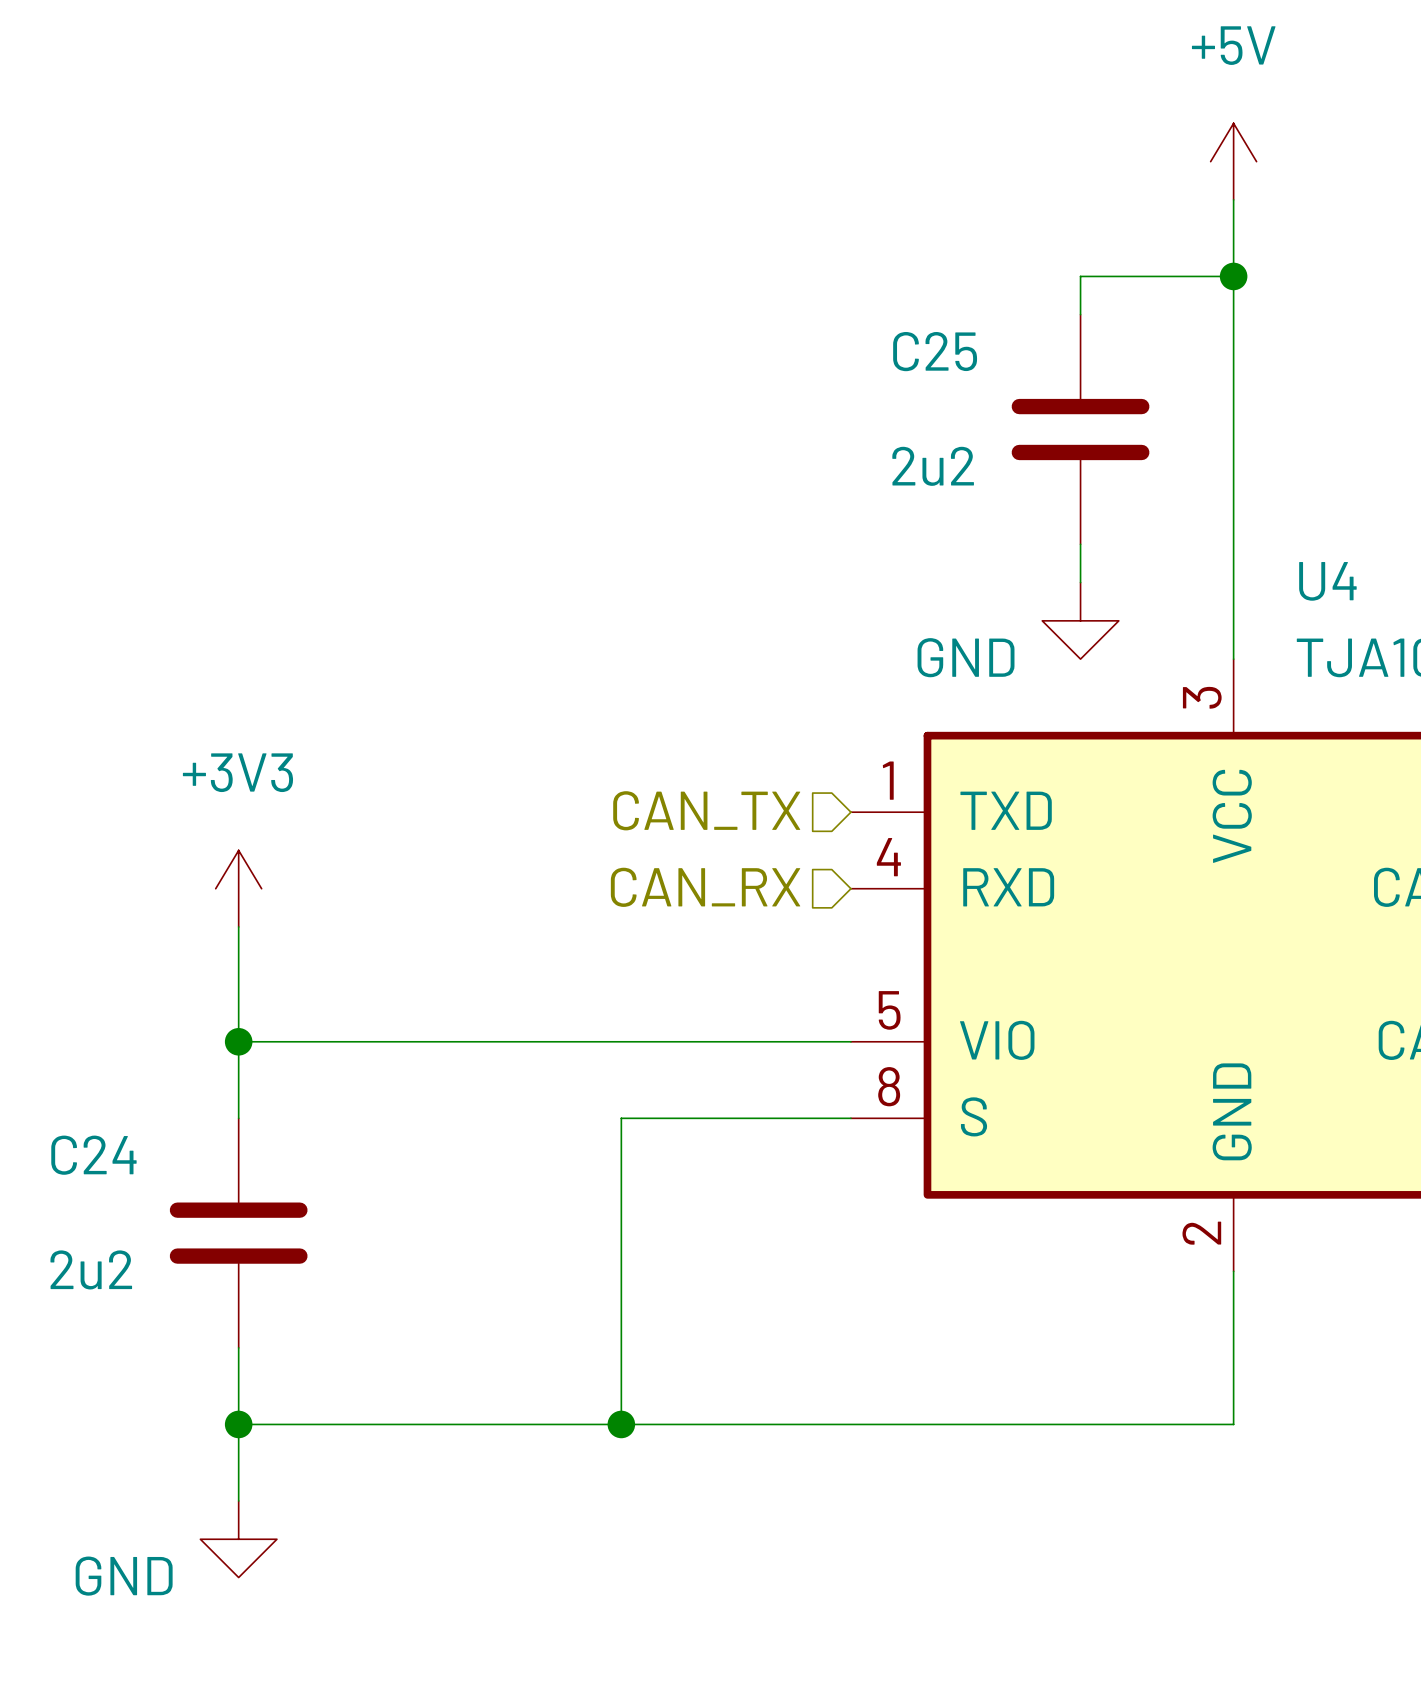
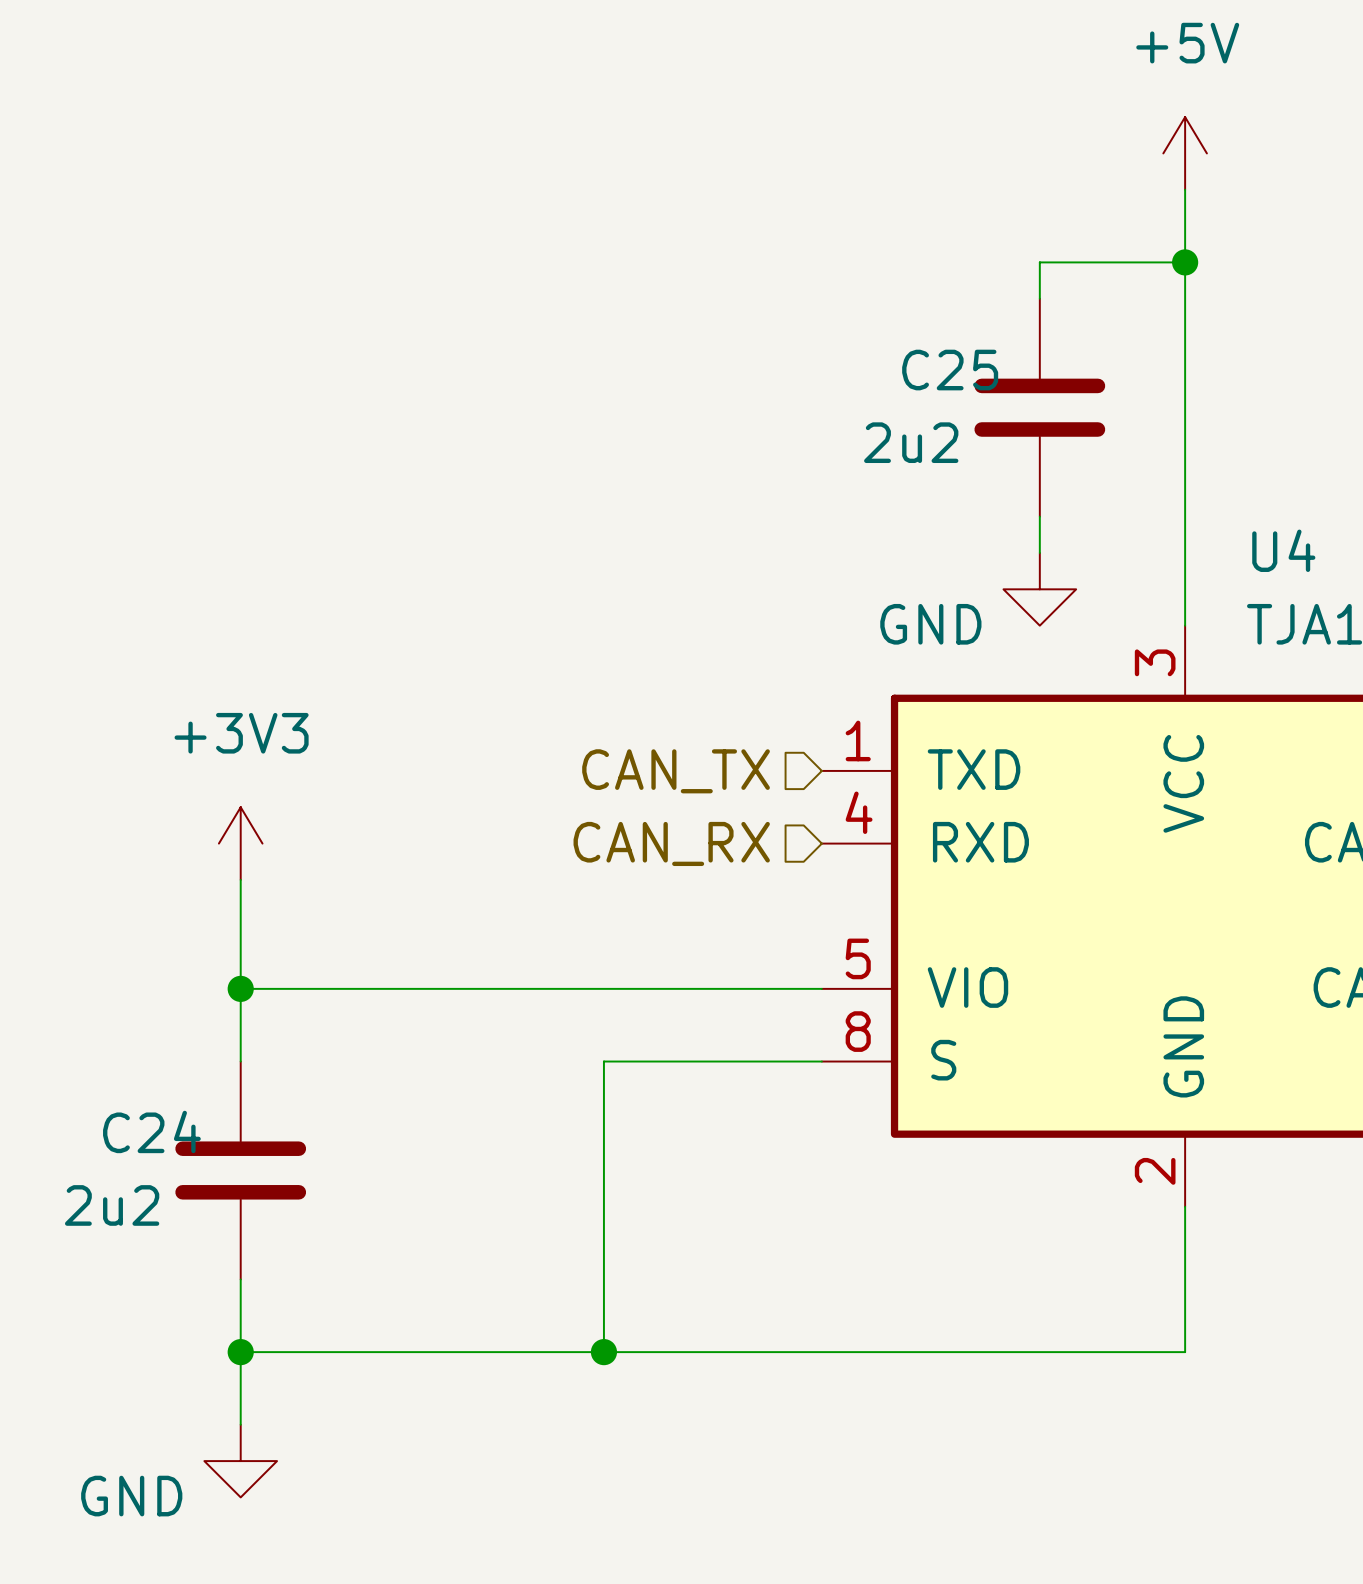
C25 name position: C25 (935, 351) -> C25 (950, 370)
C24 name position: C24 (93, 1155) -> C24 (151, 1131)

